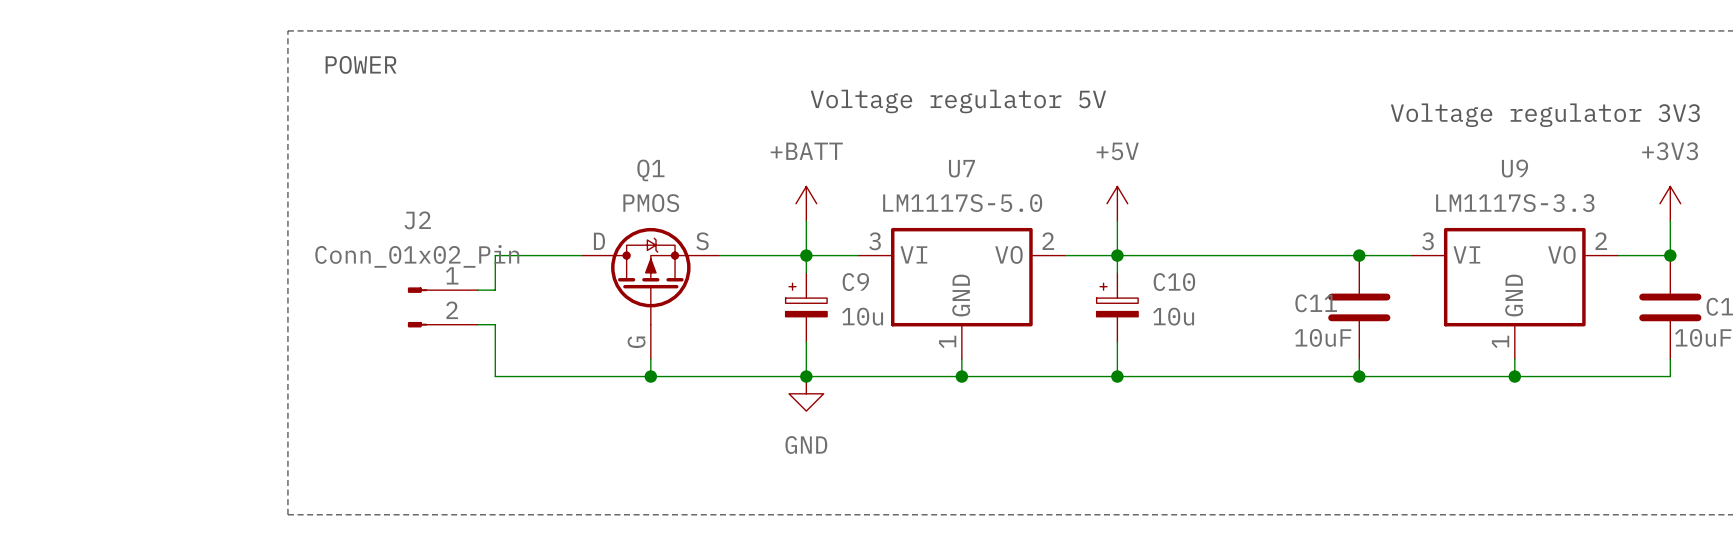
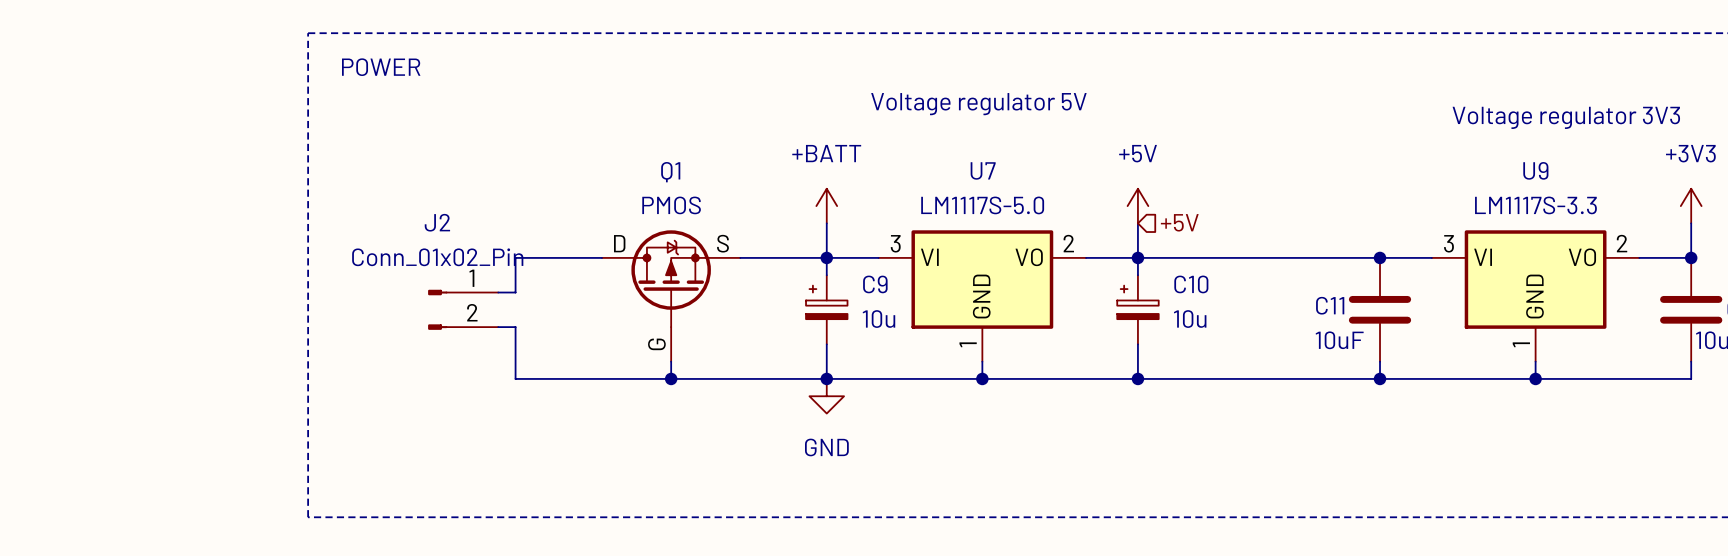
hierarchical label: none -> +5V (1179, 222)

